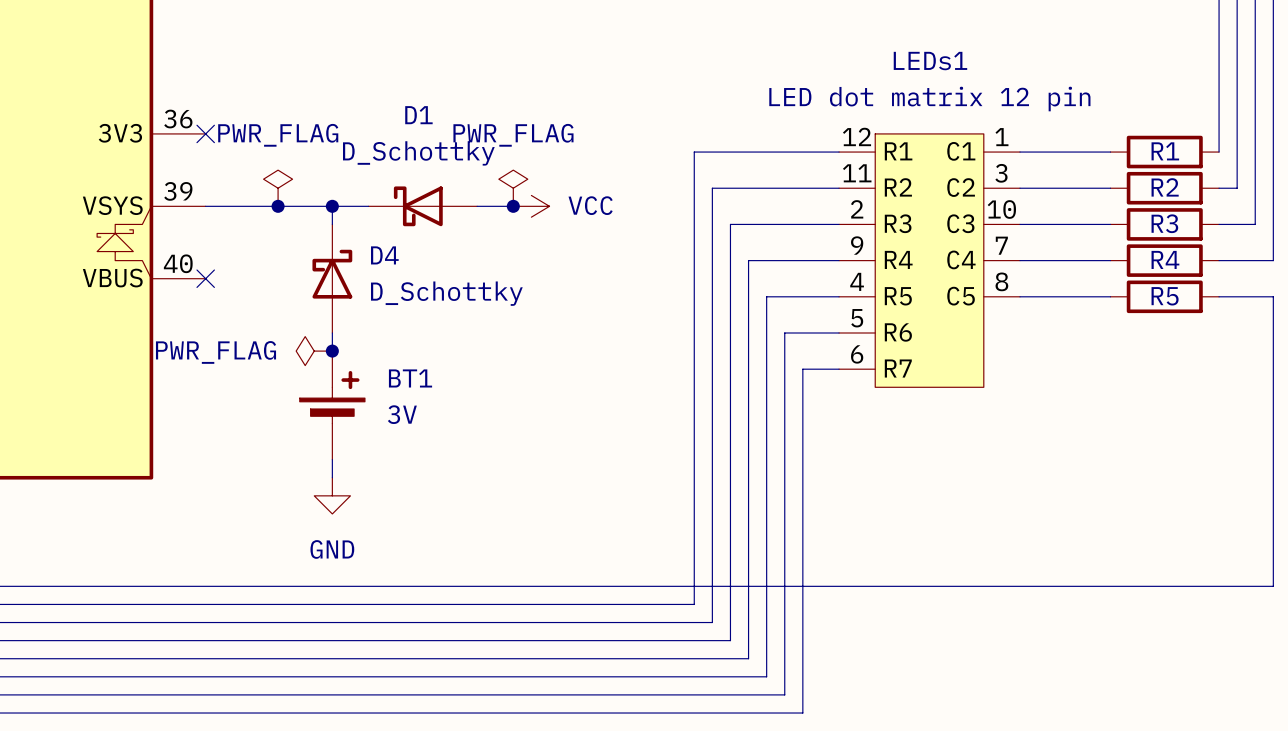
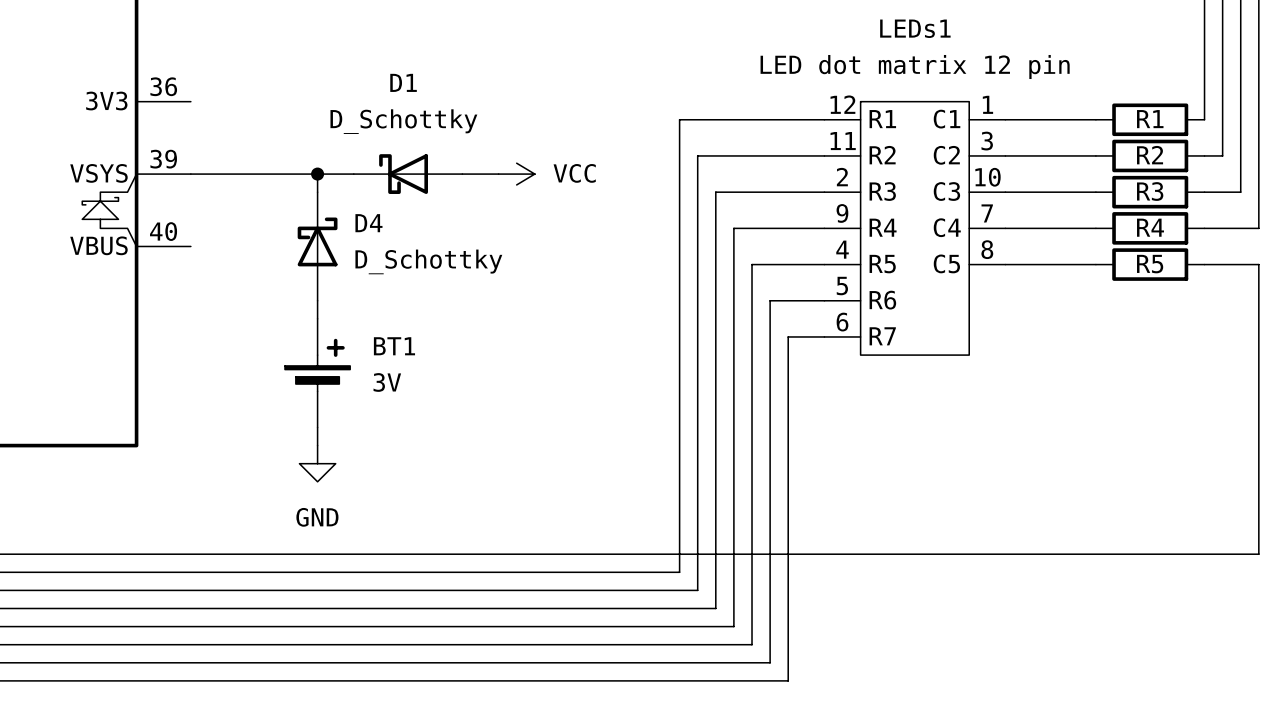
no-connect mark: (205, 133) -> none
power symbol: PWR_FLAG (278, 188) -> none
power symbol: PWR_FLAG (513, 188) -> none
junction: (278, 206) -> none
junction: (513, 206) -> none
no-connect mark: (205, 278) -> none
power symbol: PWR_FLAG (314, 351) -> none
junction: (332, 351) -> none

